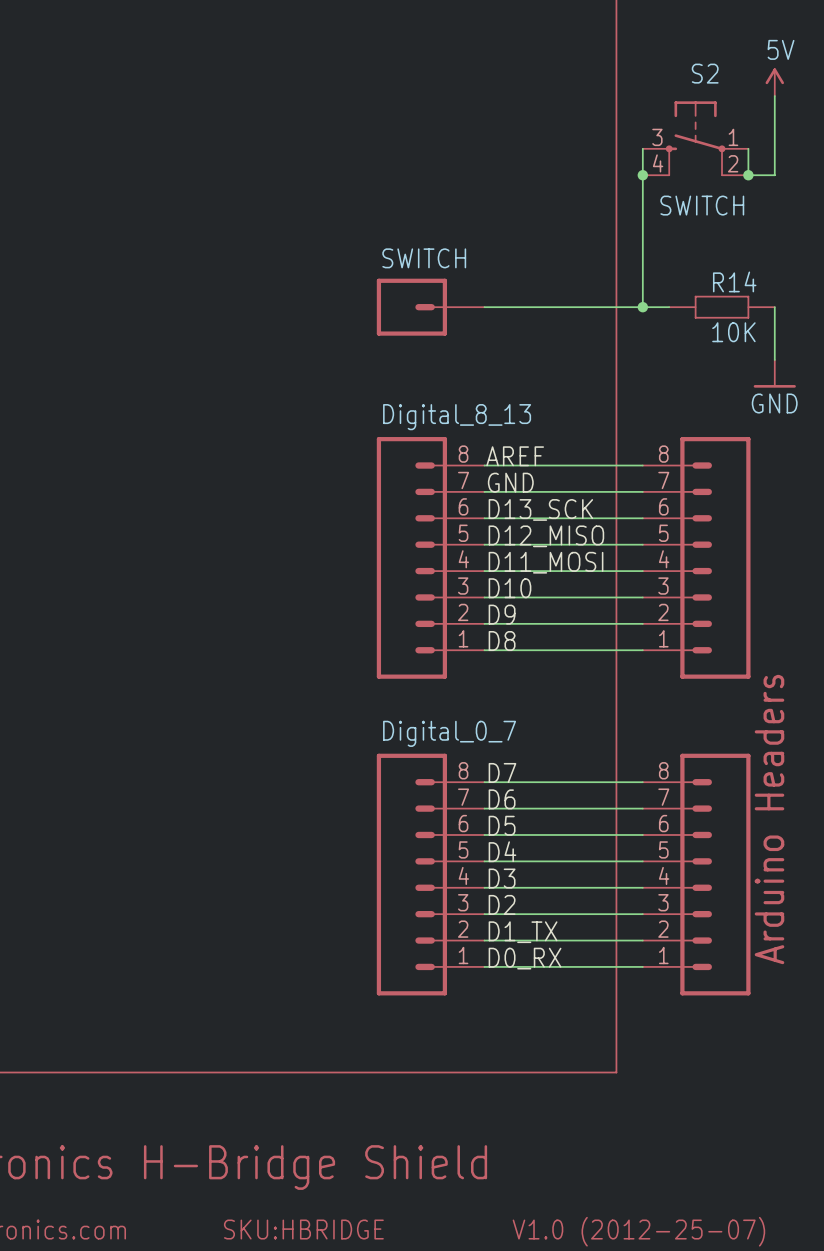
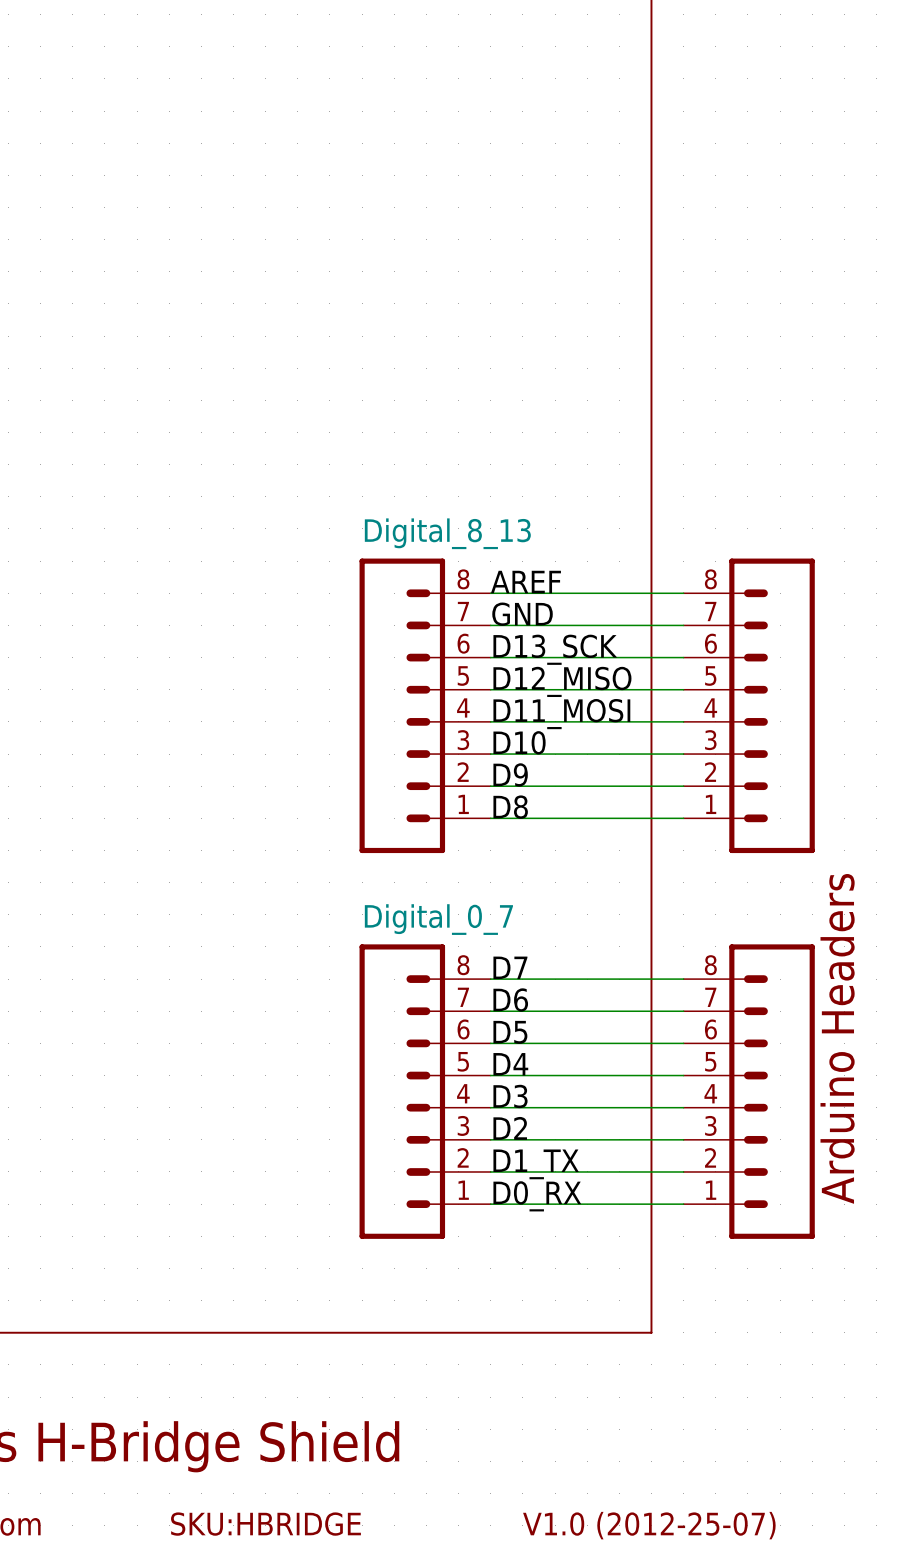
power symbol: 5V (774, 82) -> none
wire: (774, 96) (774, 175) (748, 175) (748, 148) -> none
S2: SWITCH (695, 138) -> none
wire: (642, 148) (642, 307) -> none
junction: (642, 175) -> none
junction: (748, 175) -> none
part: SWITCH (430, 307) -> none
wire: (484, 307) (669, 307) -> none
junction: (642, 307) -> none
R14: 10K (722, 307) -> none
wire: (774, 307) (774, 359) -> none
power symbol: GND (774, 373) -> none

